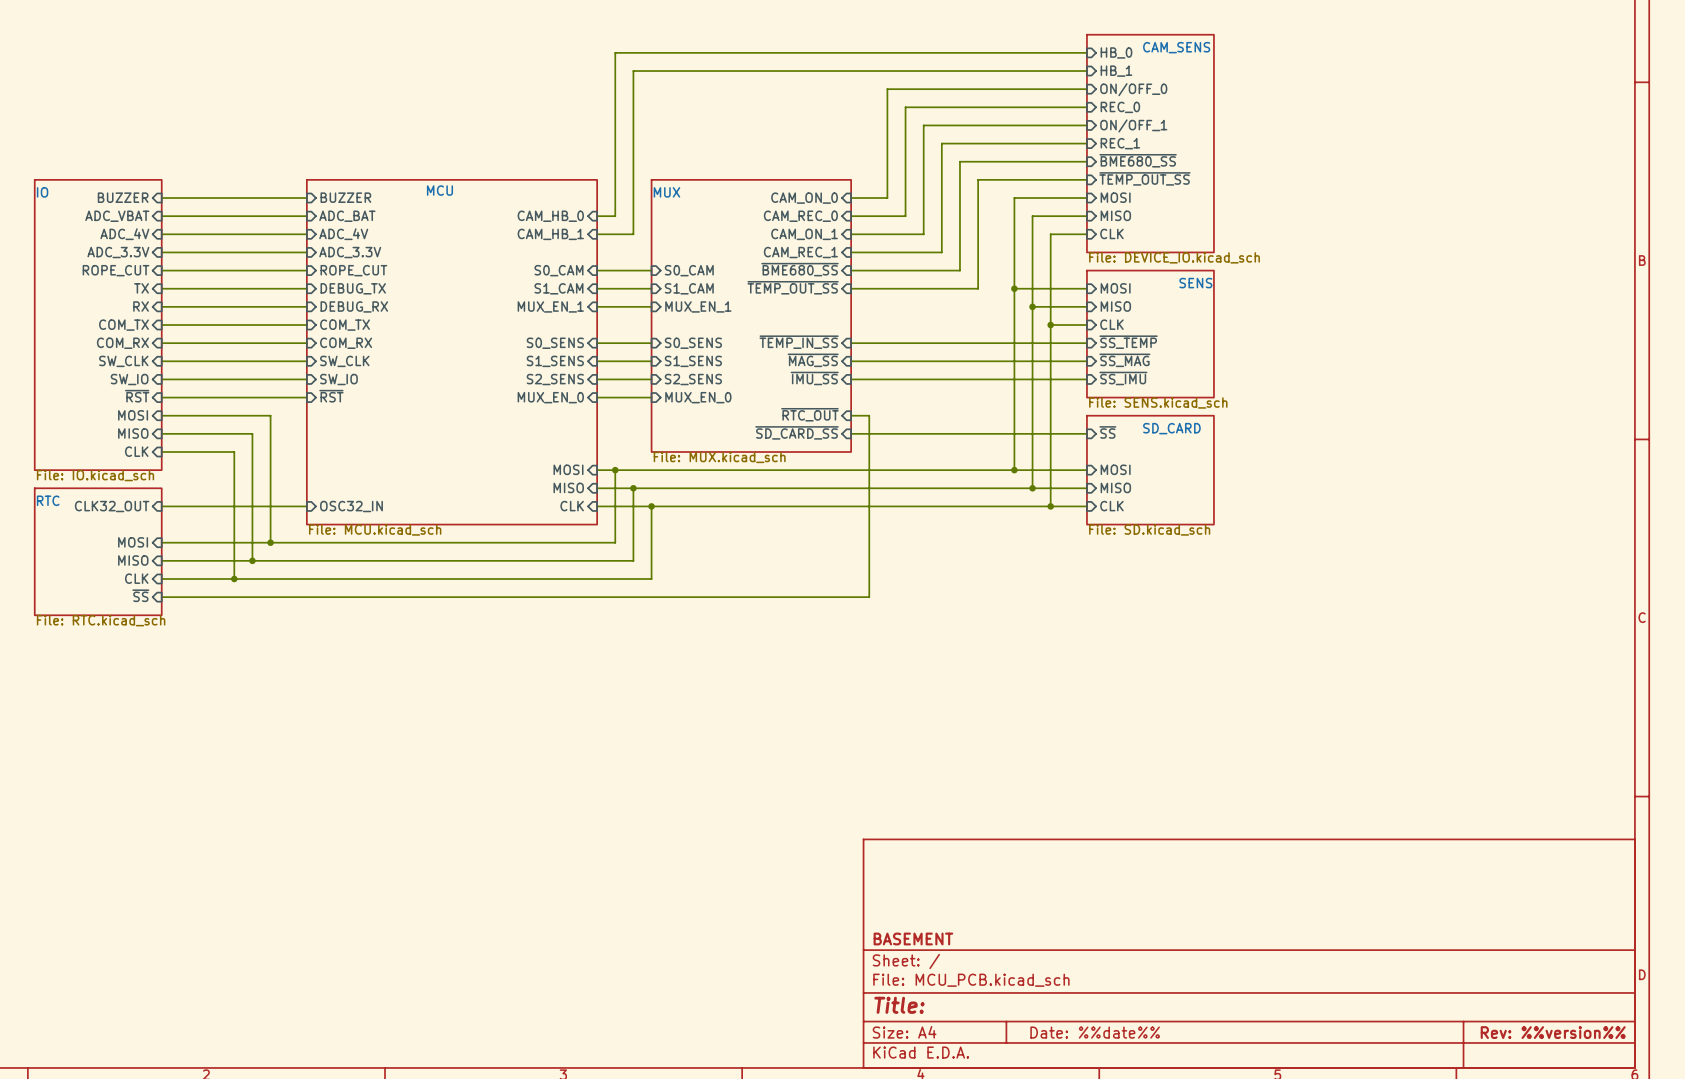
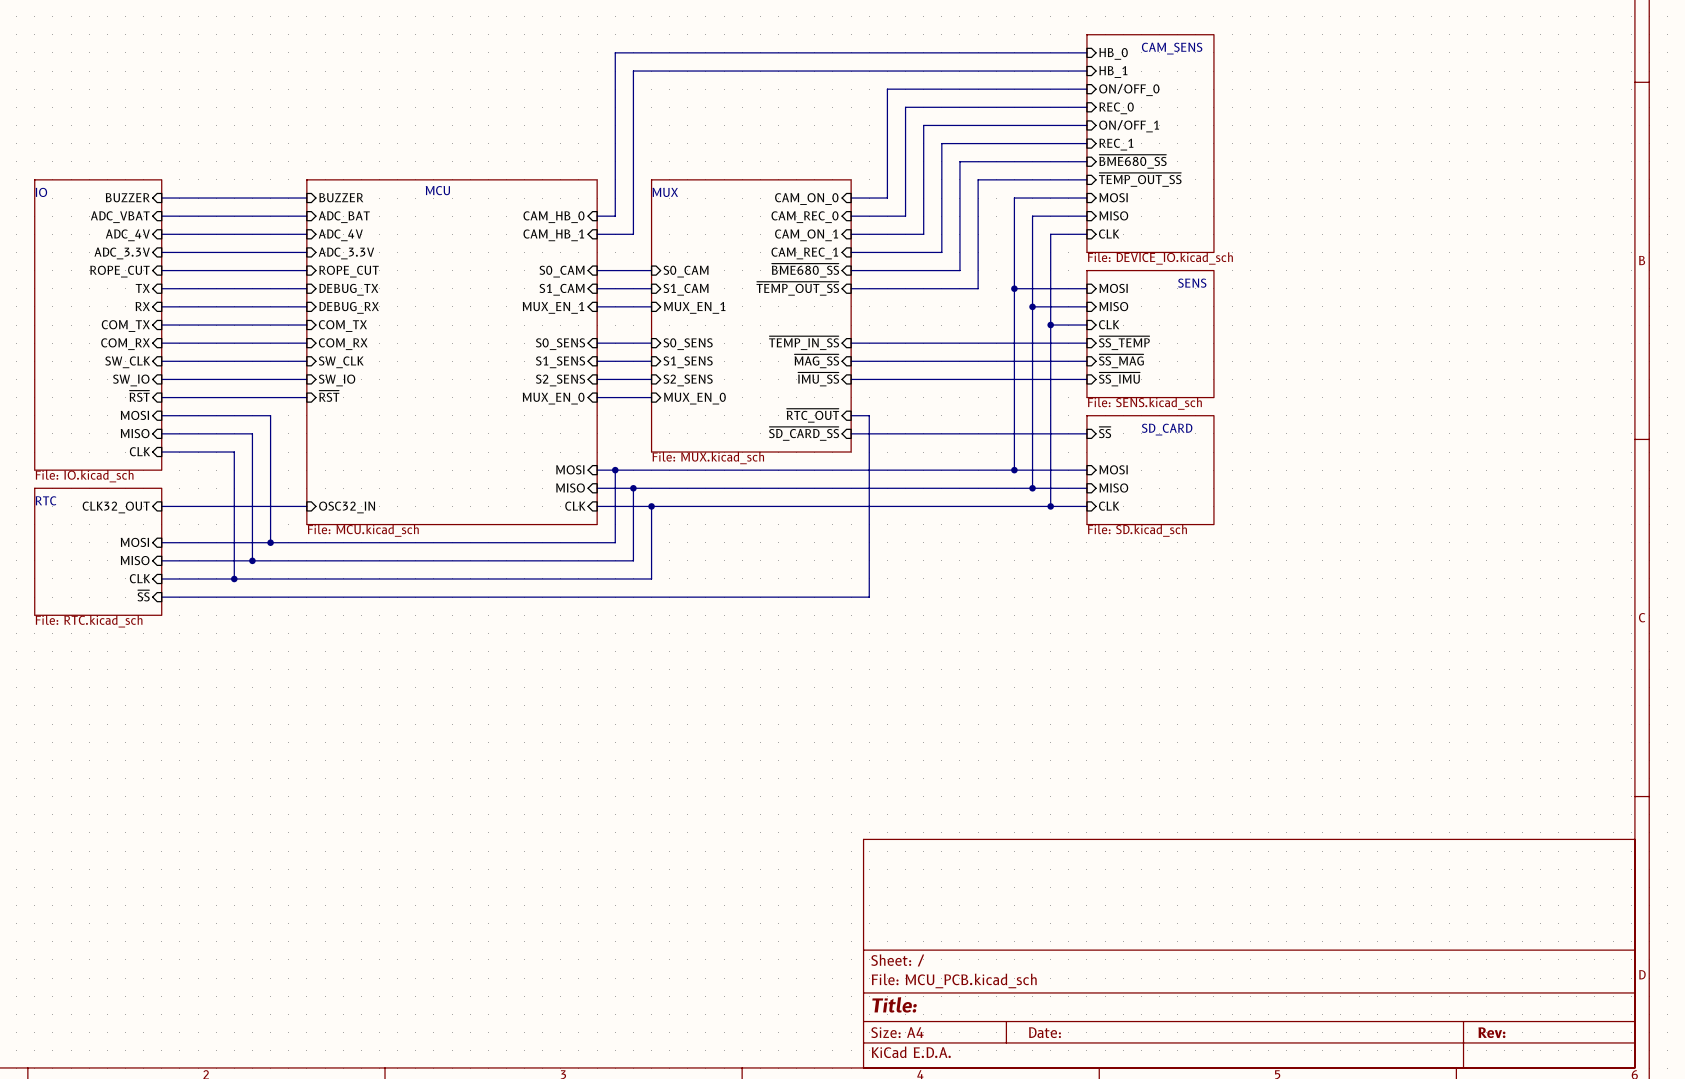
title block: BASEMENT (913, 939) -> none
title block: Date: %%date%% (1095, 1032) -> Date: (1044, 1032)
title block: Rev: %%version%% (1553, 1032) -> Rev: (1491, 1032)

